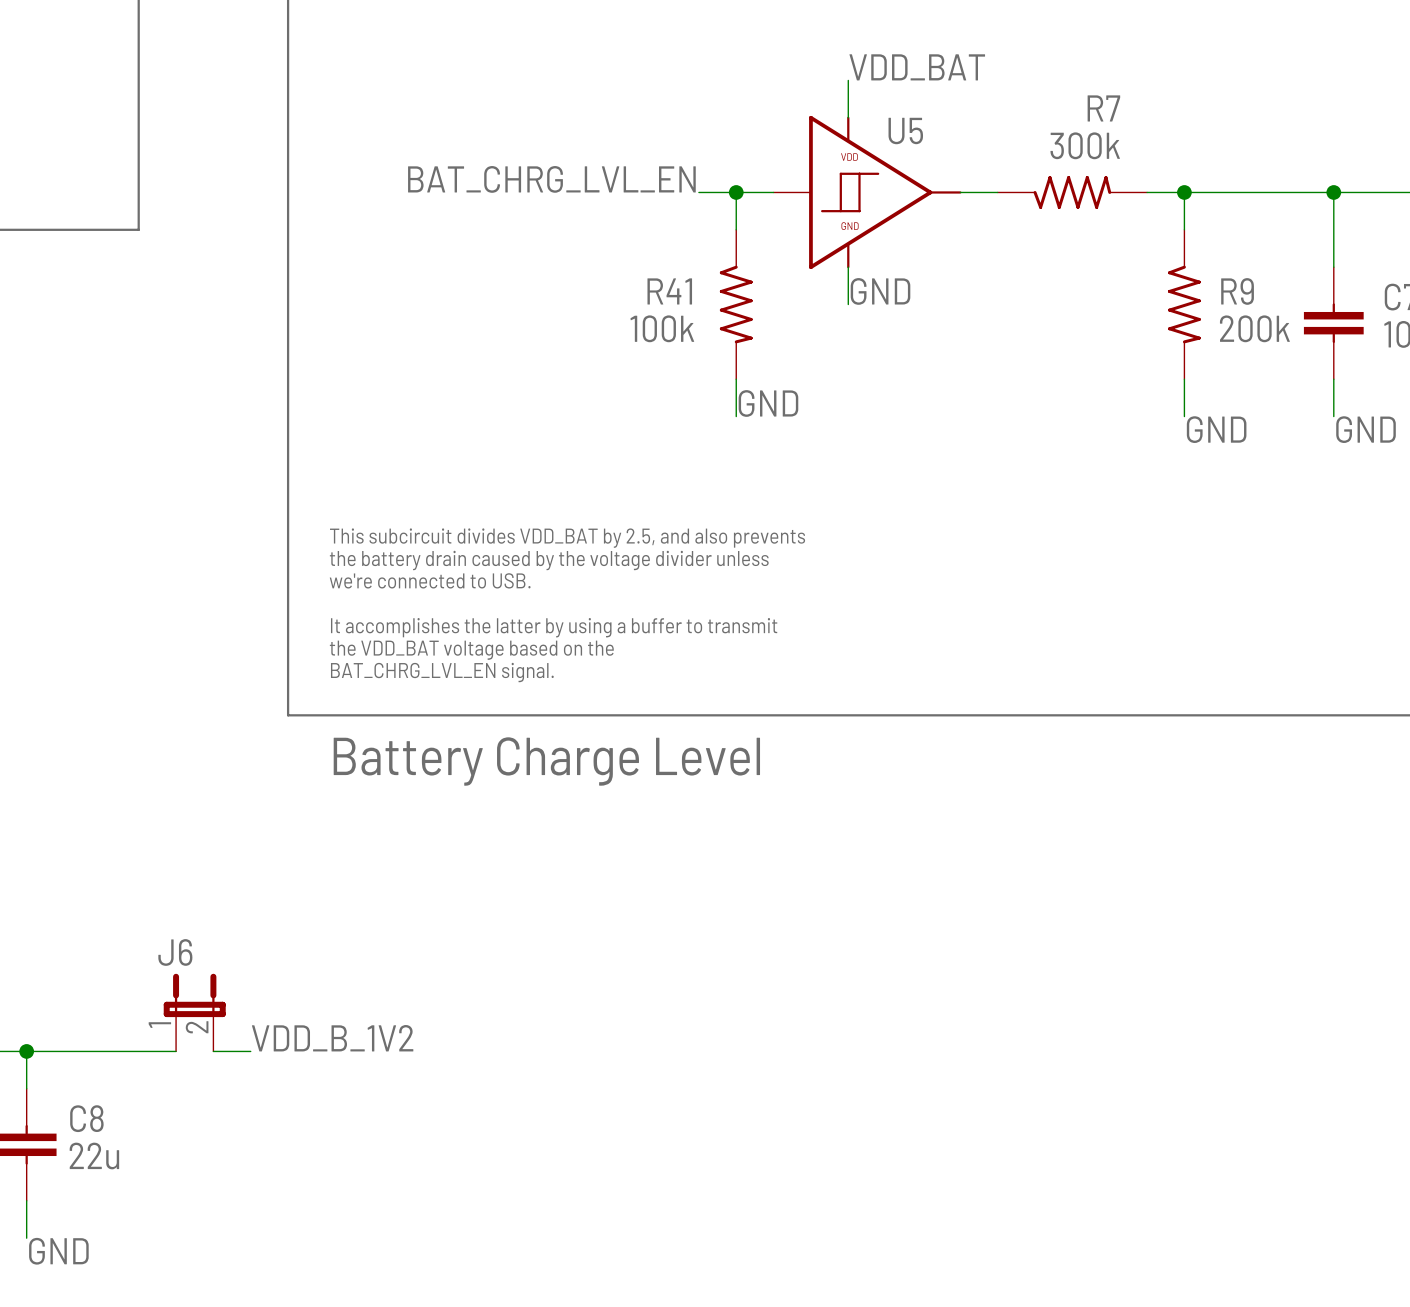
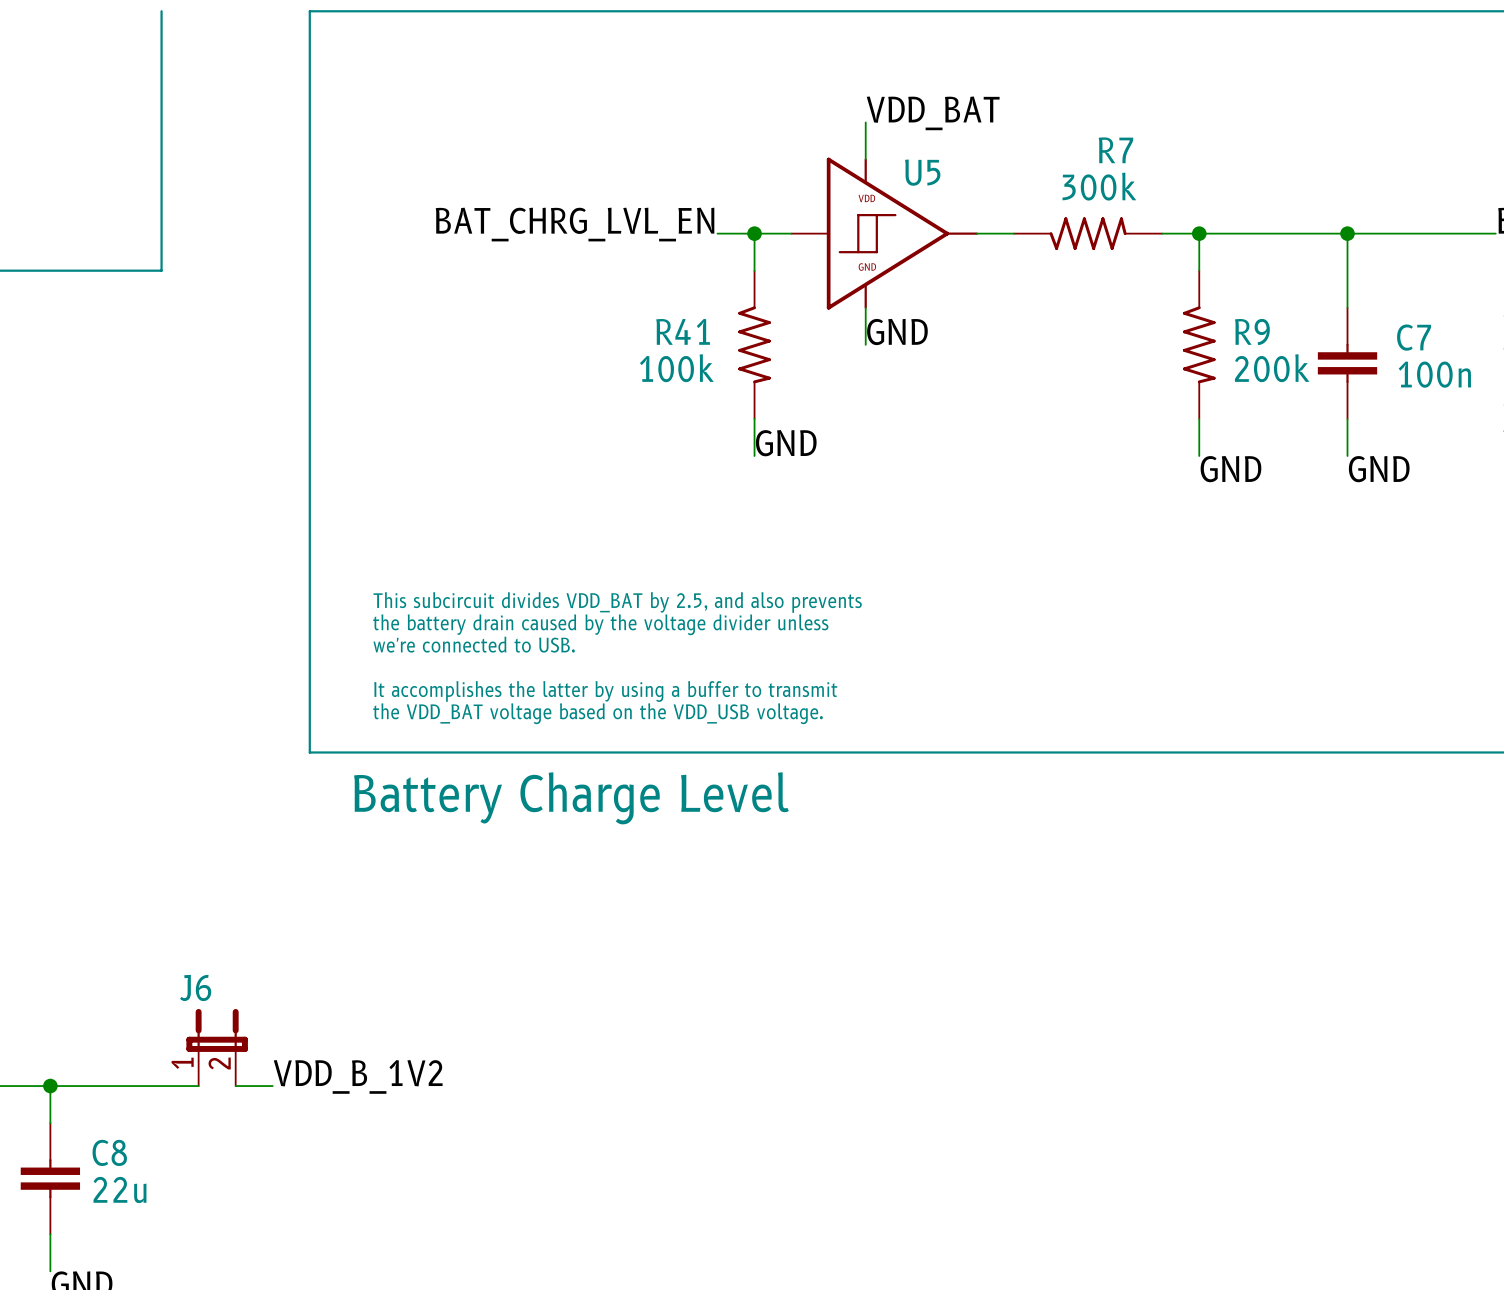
text position: This subcircuit divides VDD_BAT by 2.5, and also prevents (567, 538) -> This subcircuit divides VDD_BAT by 2.5, and also prevents (617, 602)
text position: the battery drain caused by the voltage divider unless (549, 560) -> the battery drain caused by the voltage divider unless (600, 624)
text position: we're connected to USB. (430, 580) -> we're connected to USB. (474, 644)
text position: It accomplishes the latter by using a buffer to transmit (554, 627) -> It accomplishes the latter by using a buffer to transmit (605, 691)
text: the VDD_BAT voltage based on the (471, 650) -> the VDD_BAT voltage based on the VDD_USB voltage. (598, 713)
text: BAT_CHRG_LVL_EN signal. (442, 672) -> none

